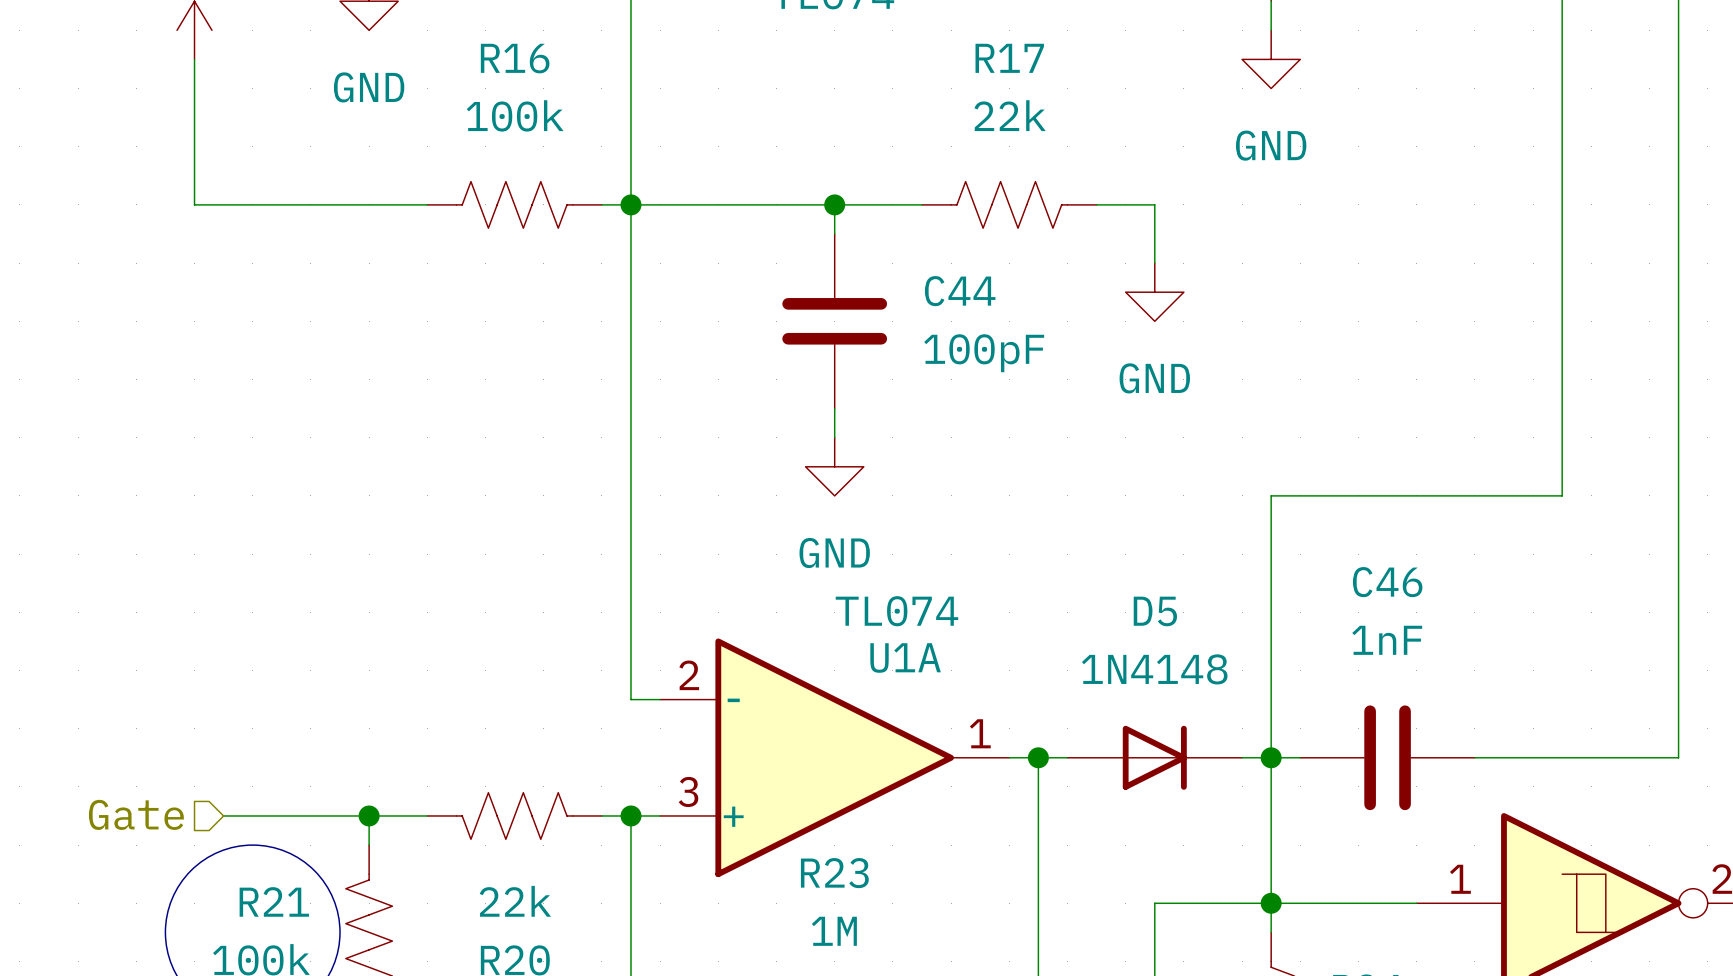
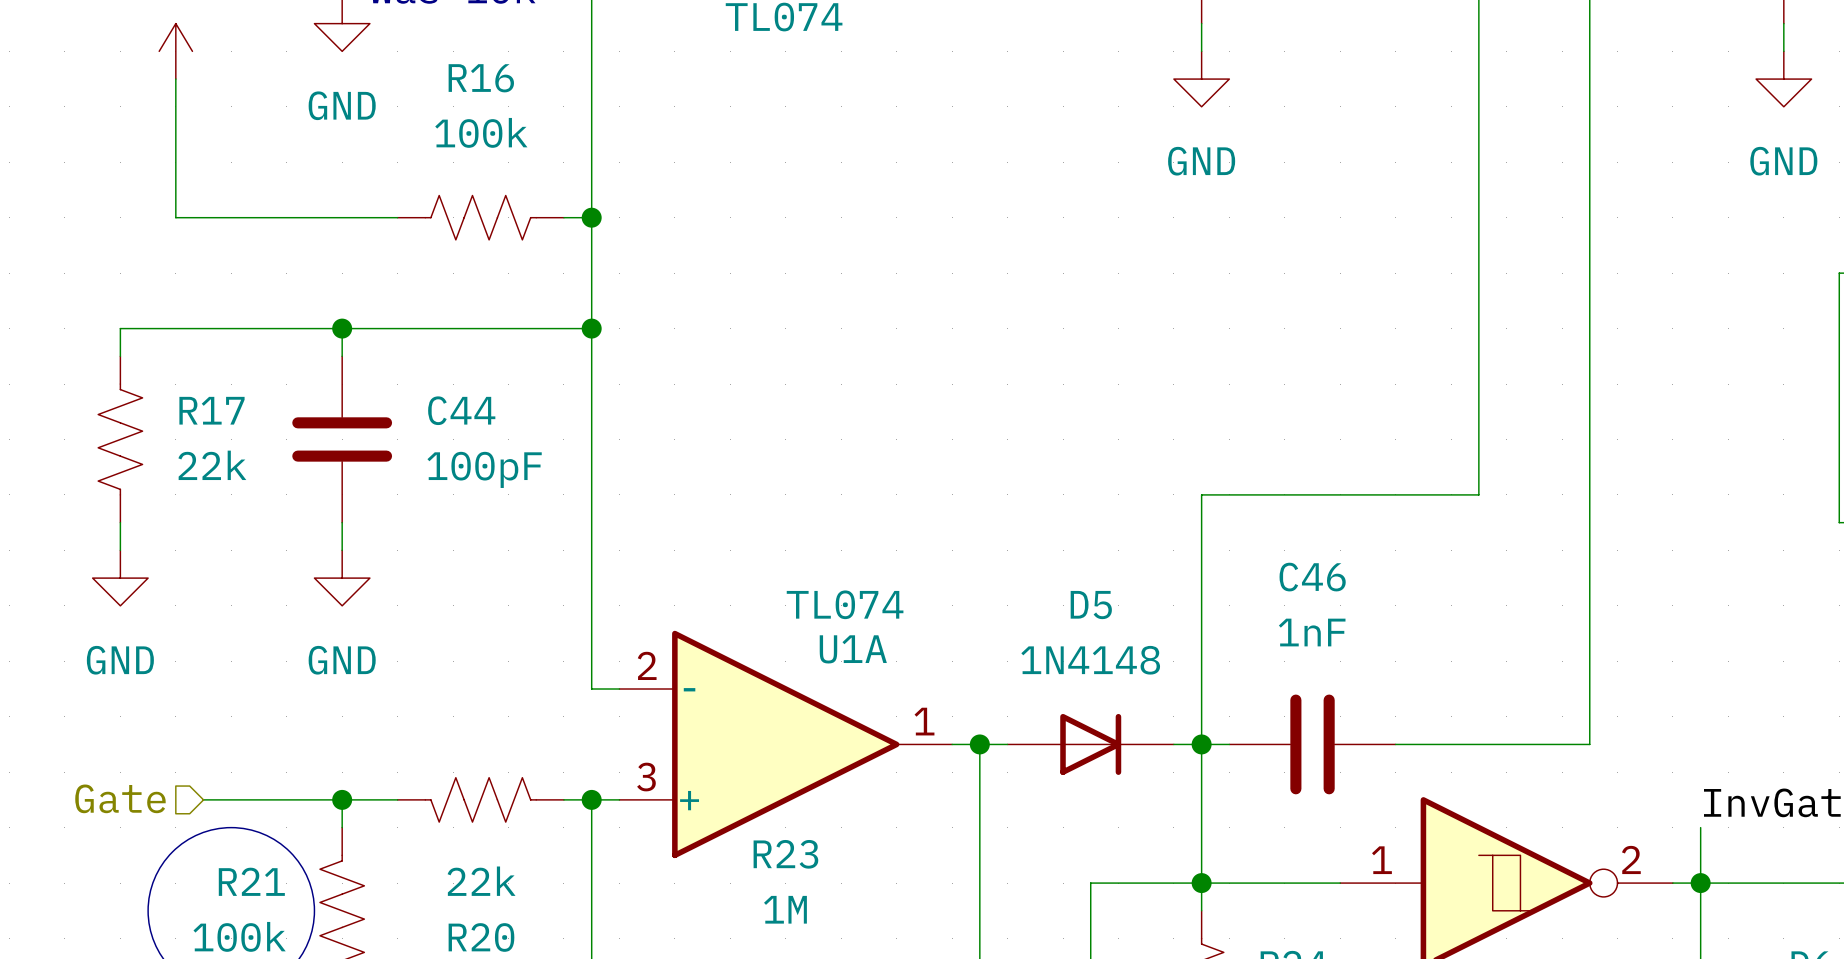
R17 name position: R17 (1009, 58) -> R17 (211, 410)
wire: (631, 204) (921, 204) -> none
wire: (834, 204) (834, 234) -> (342, 328) (342, 356)
junction: (834, 204) -> none
R17 rotation: 0° (1009, 204) -> 90° clockwise (120, 439)
R17 position: (1009, 204) -> (120, 439)
wire: (1096, 204) (1154, 204) (1154, 263) -> none
power symbol: GND (1154, 292) -> none
junction: none -> (342, 328)
wire: none -> (591, 328) (120, 328) (120, 356)
junction: none -> (591, 328)
C44 position: (834, 321) -> (342, 439)
wire: (834, 408) (834, 437) -> (342, 522) (342, 550)
power symbol: GND (834, 466) -> none
wire: none -> (120, 522) (120, 550)
power symbol: none -> GND (120, 578)
power symbol: none -> GND (342, 578)

